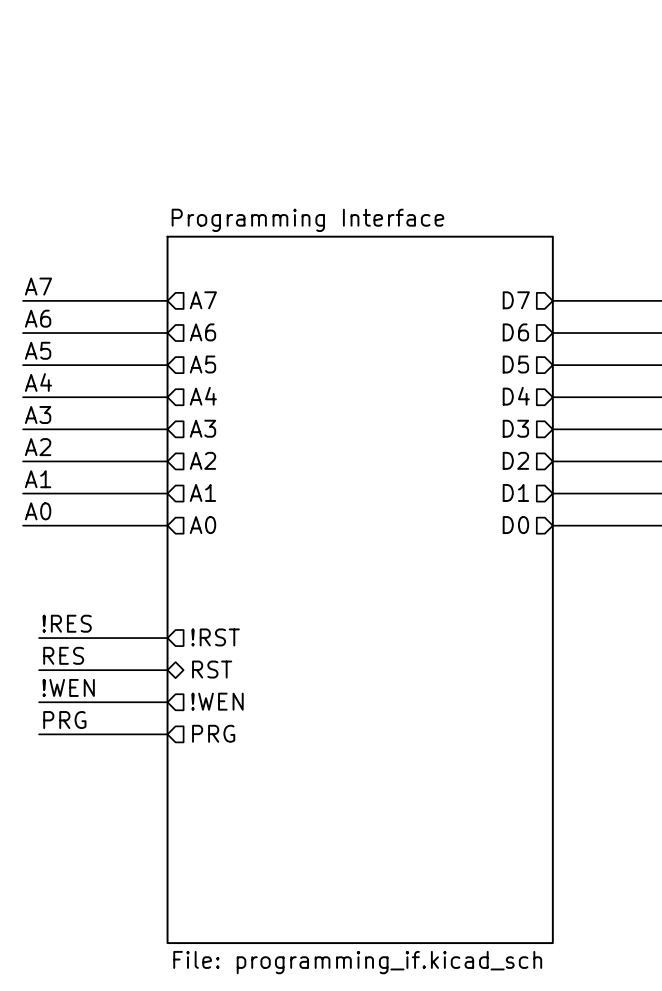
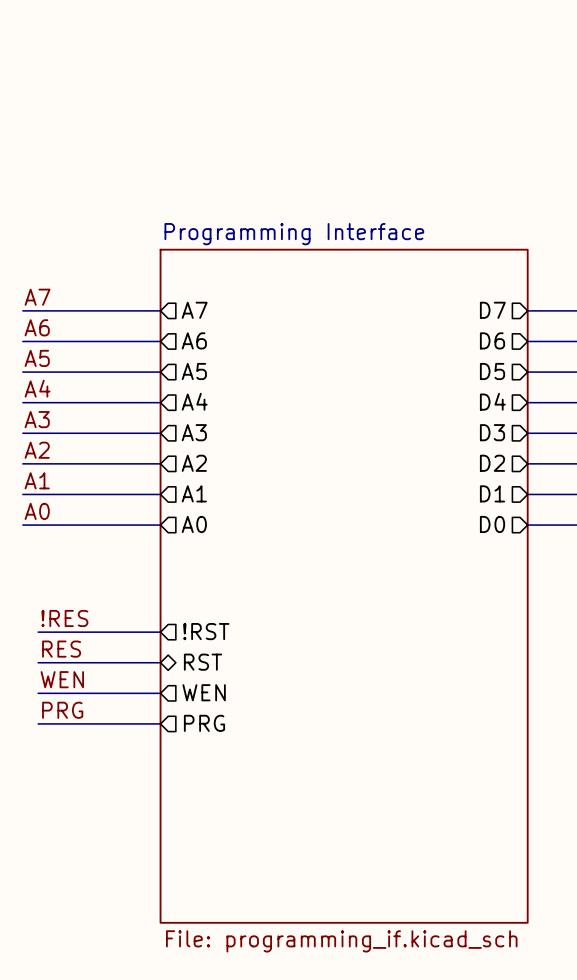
label: !WEN (68, 687) -> WEN (62, 679)
sheet pin: !WEN (217, 701) -> WEN (204, 692)

